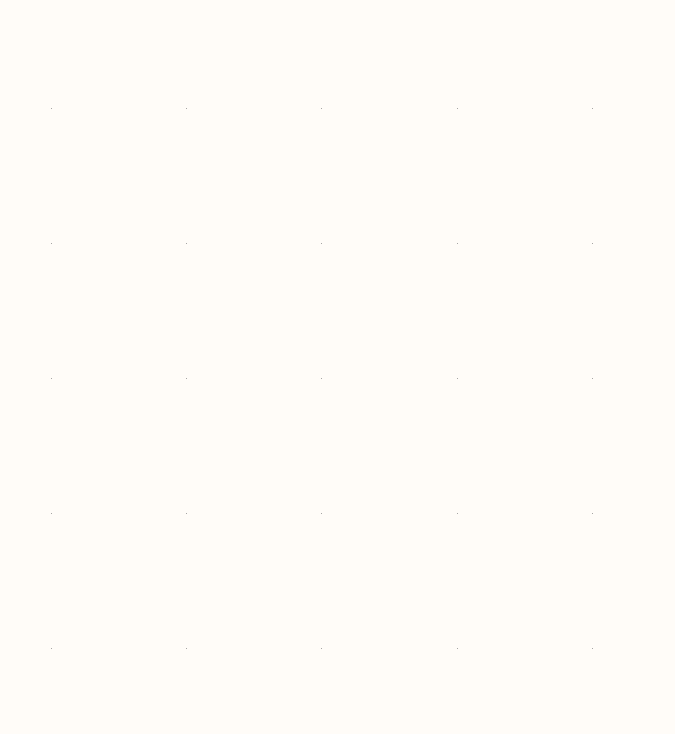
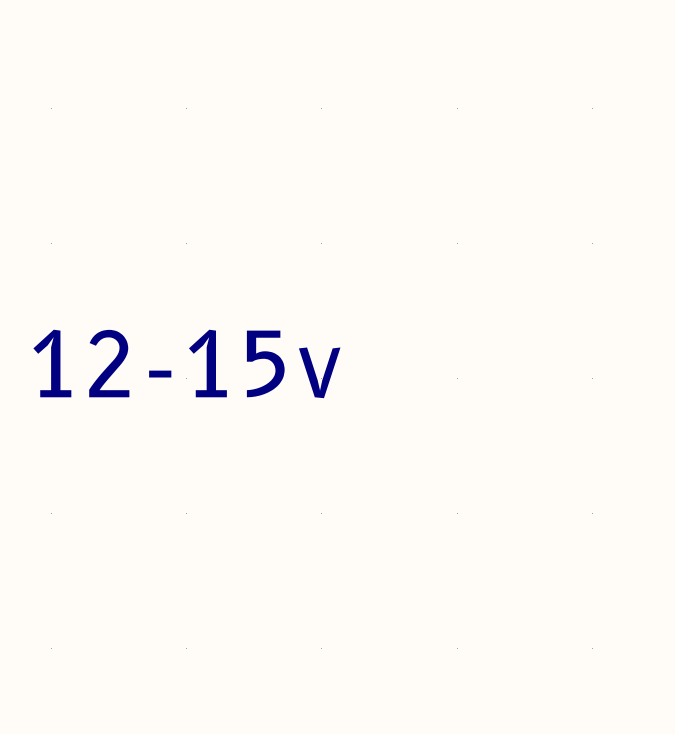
text: none -> 12-15v (186, 363)

